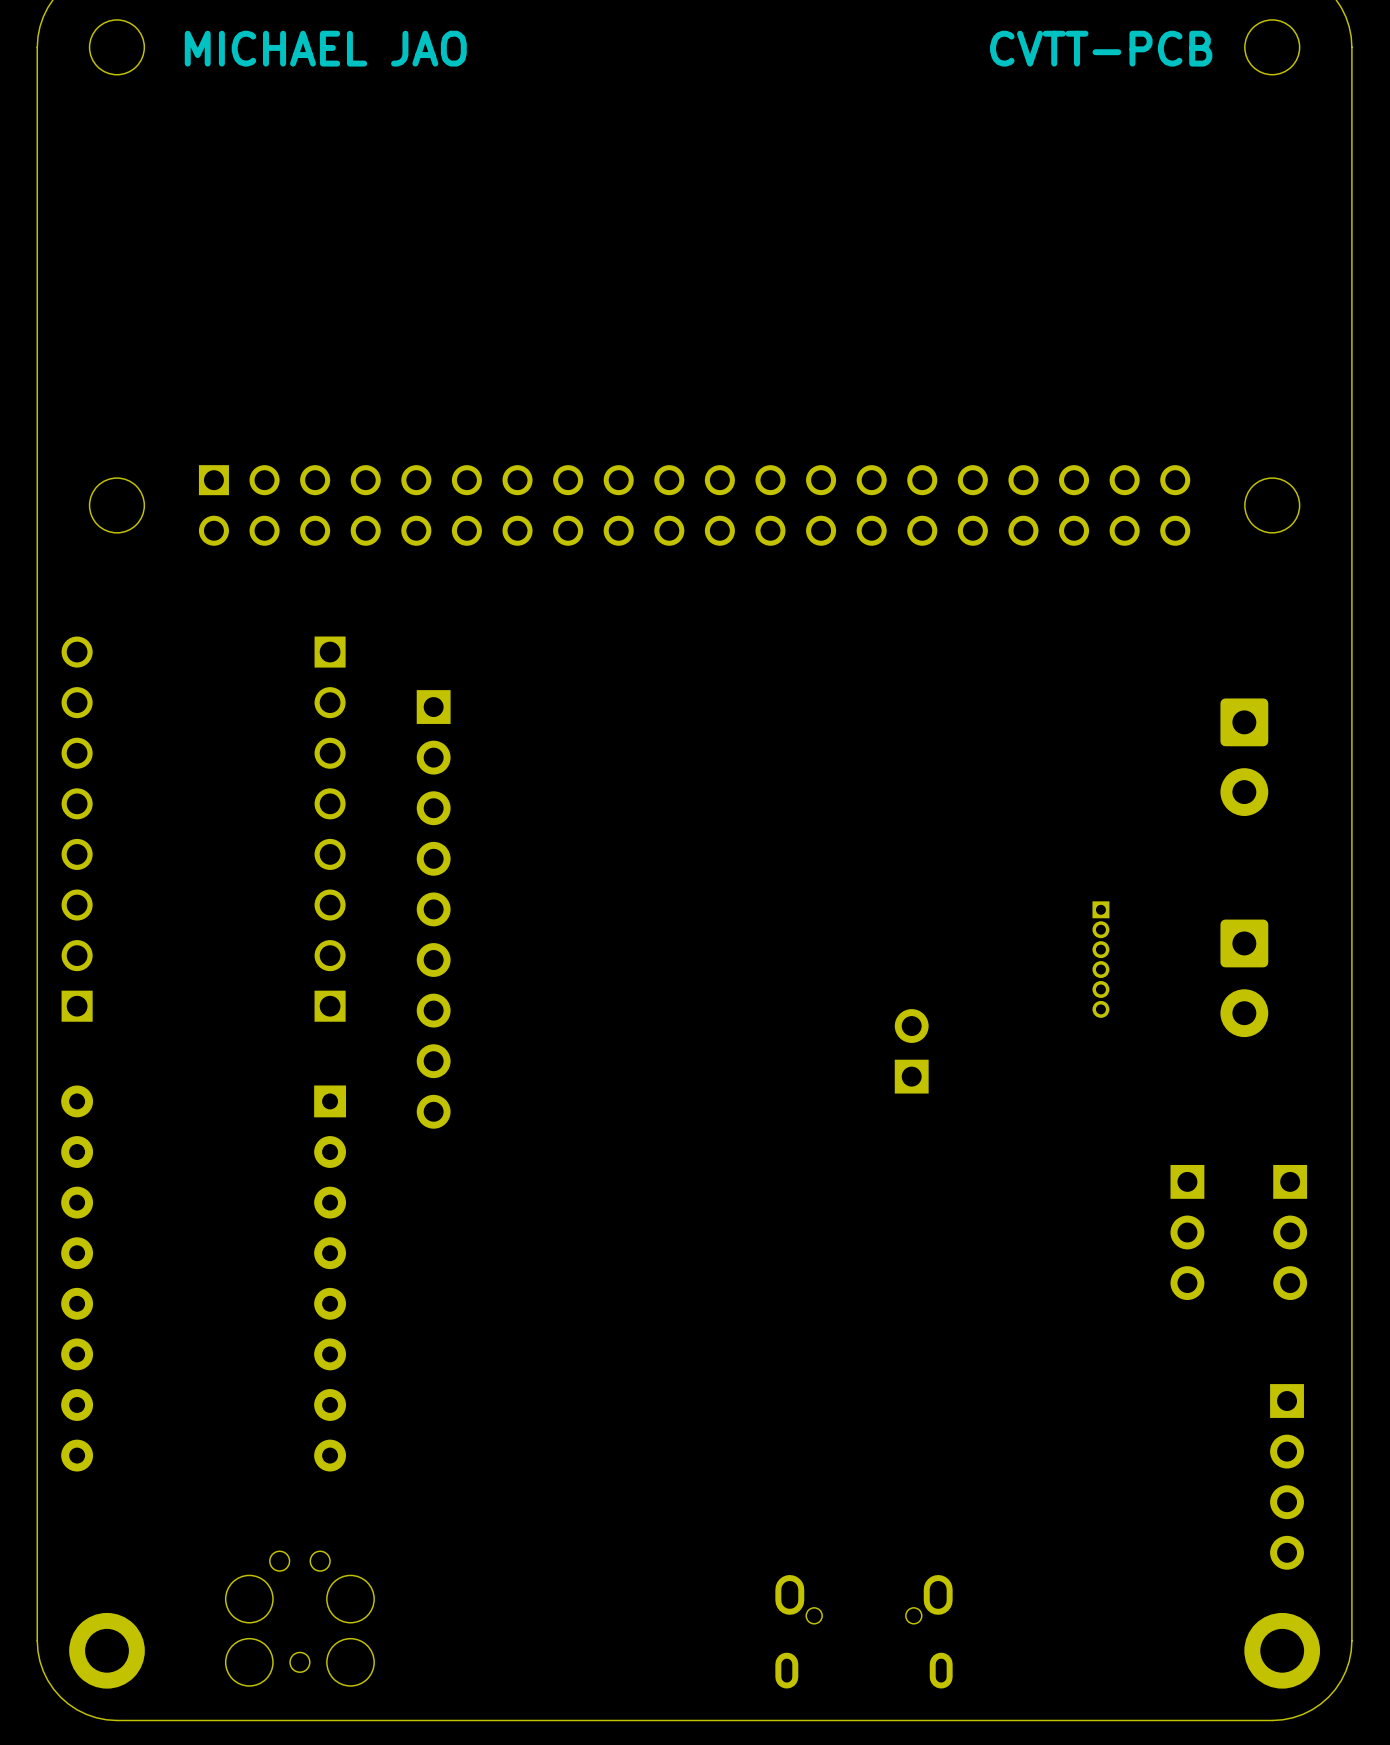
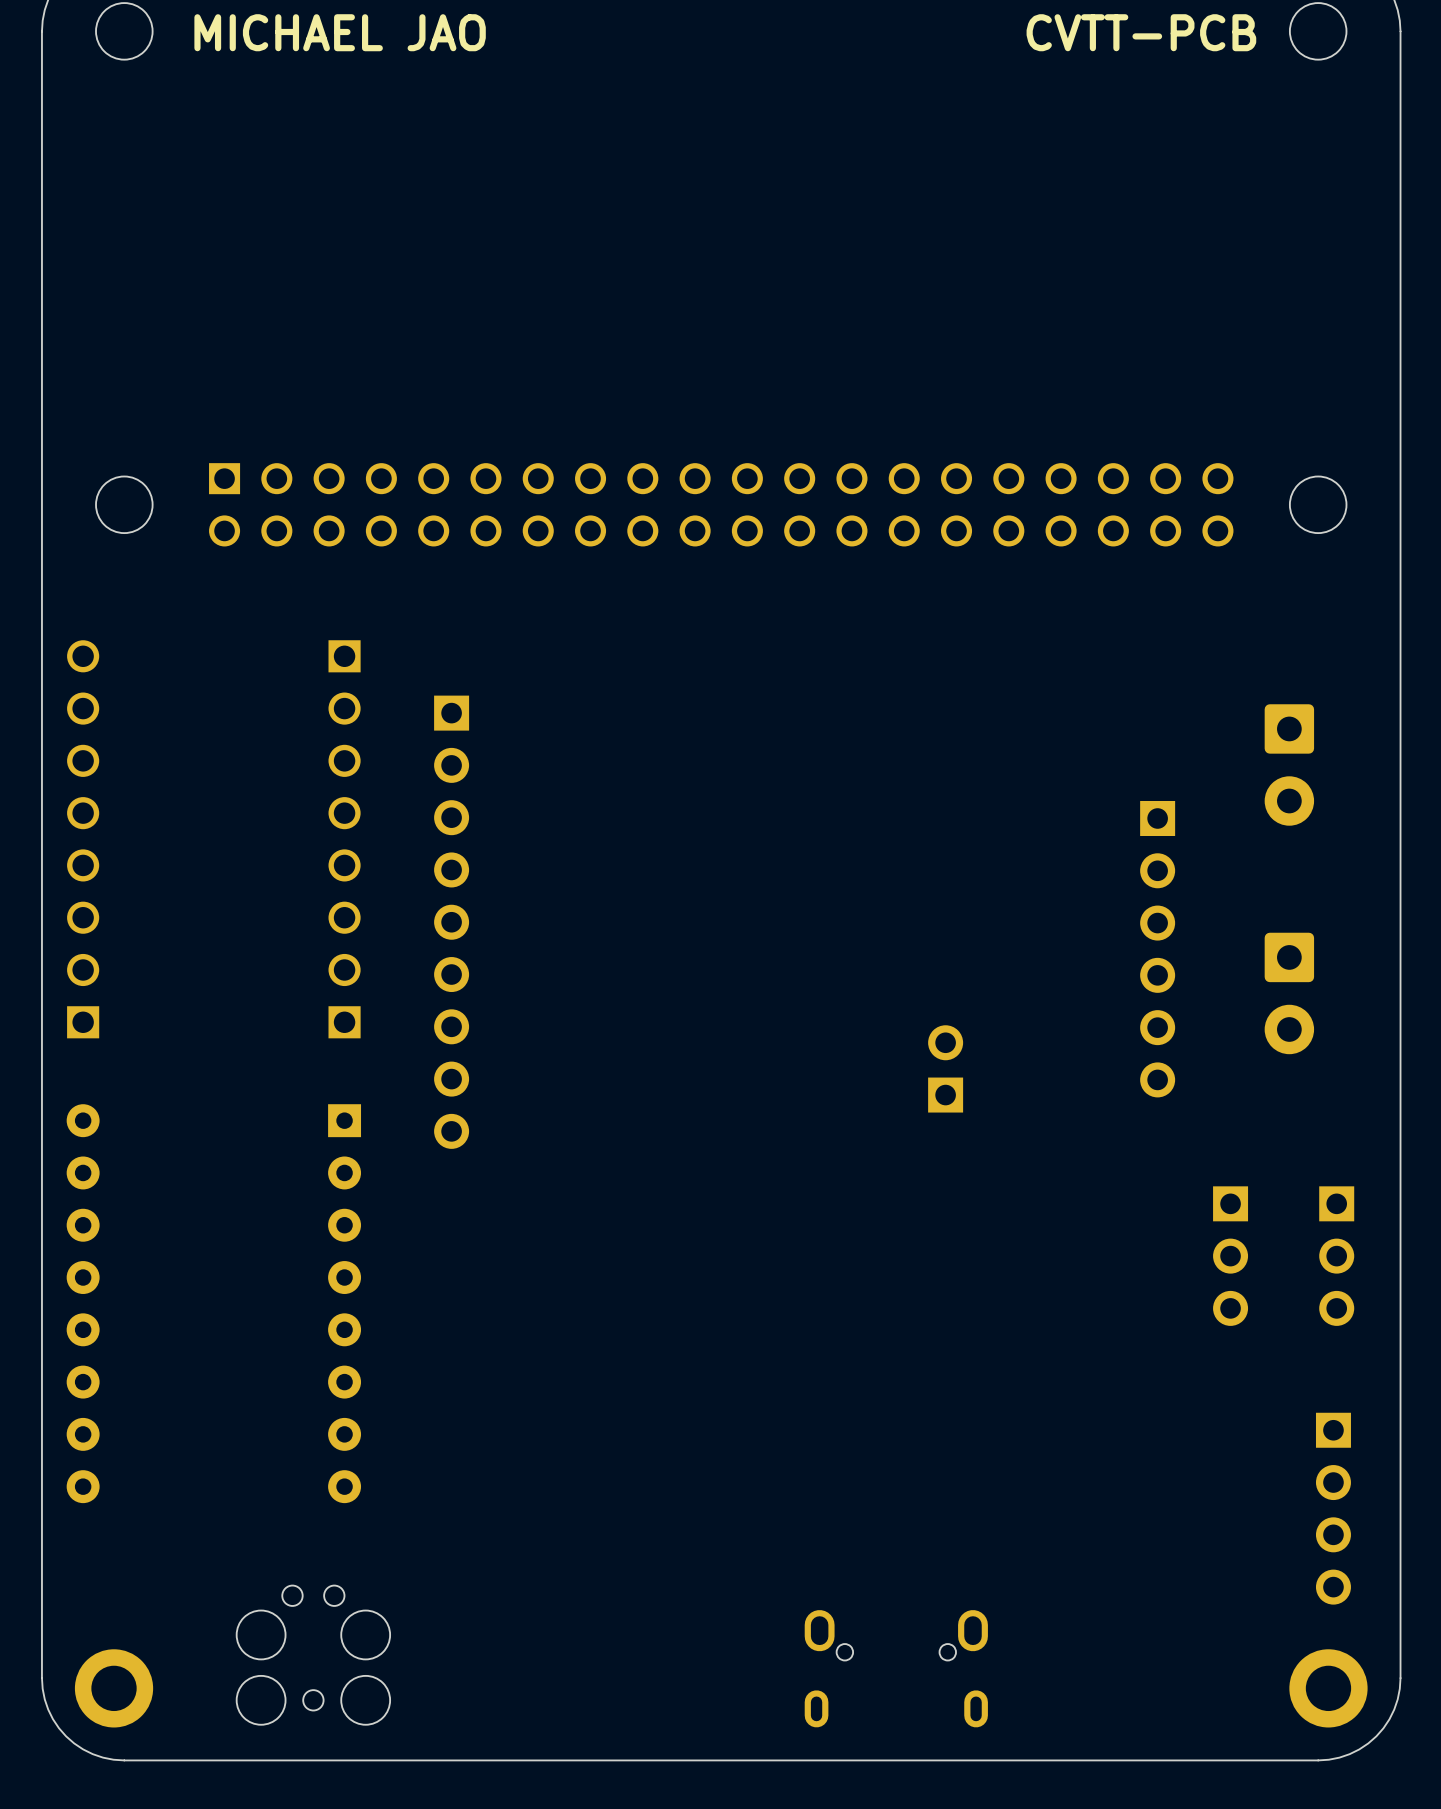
part: none -> (1157, 949)
part: (1100, 959) -> none

